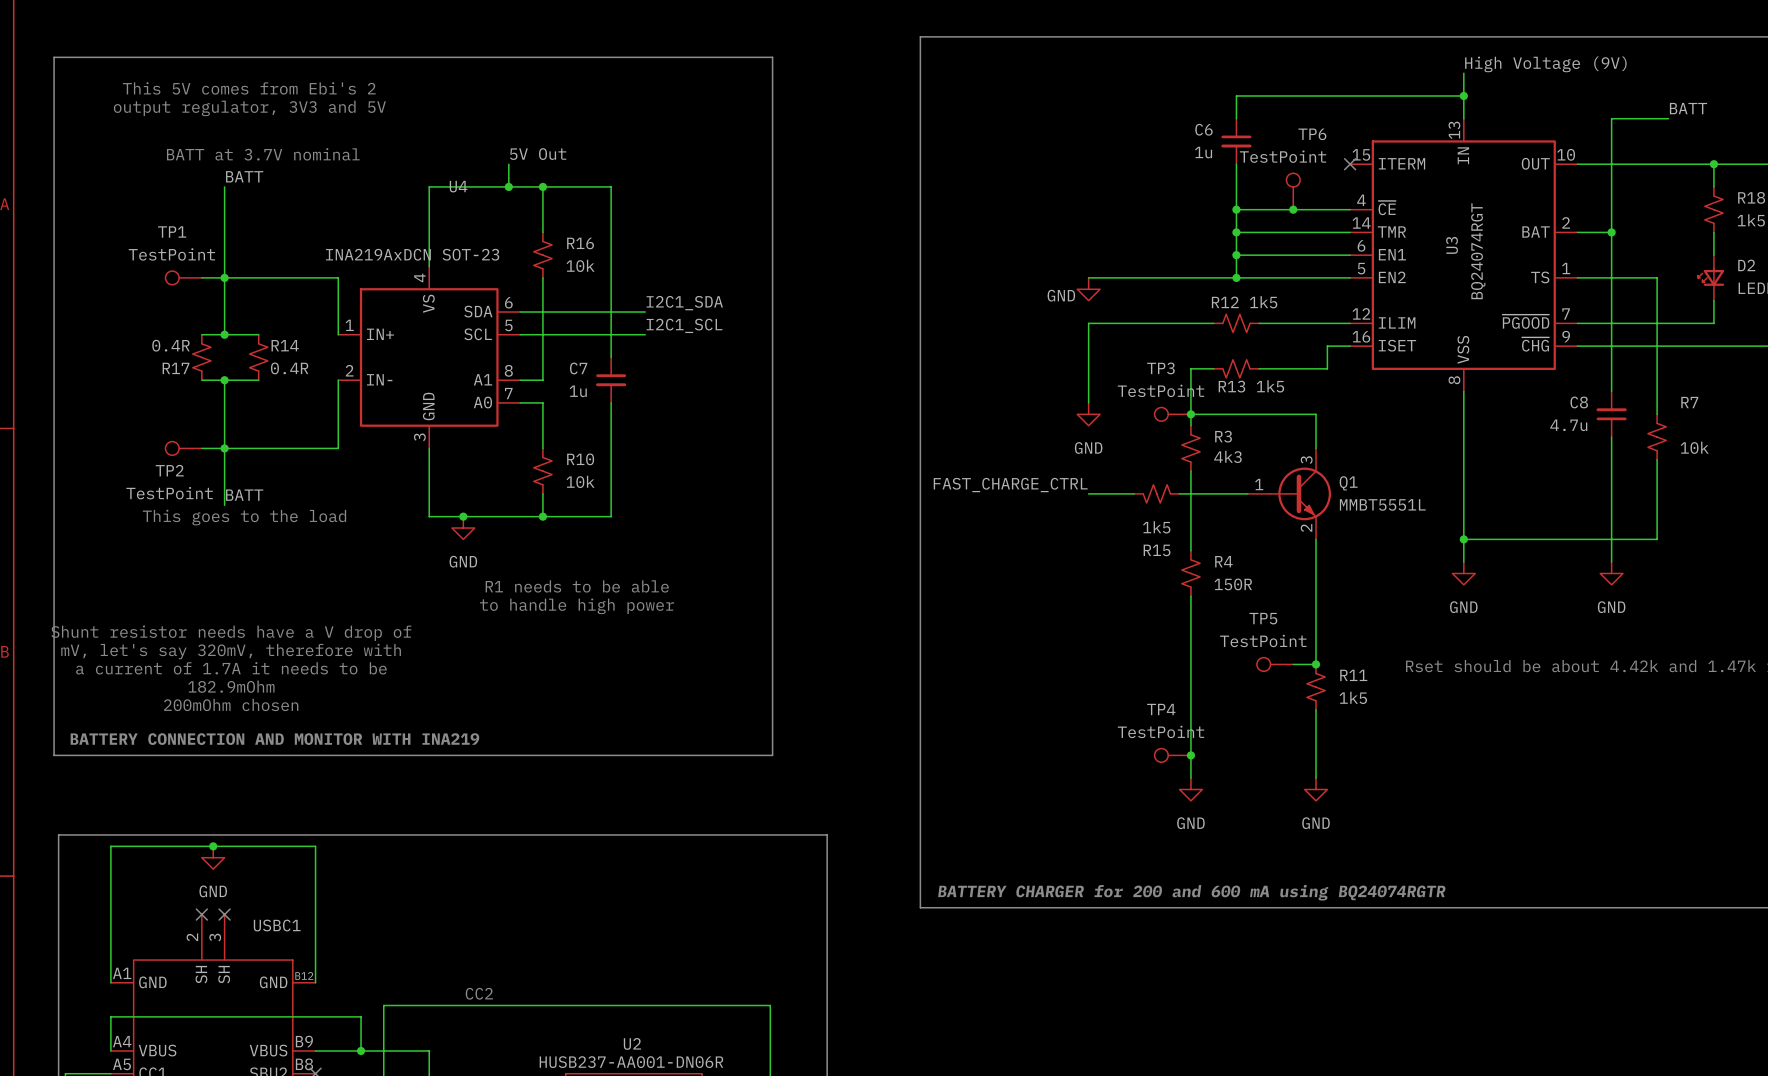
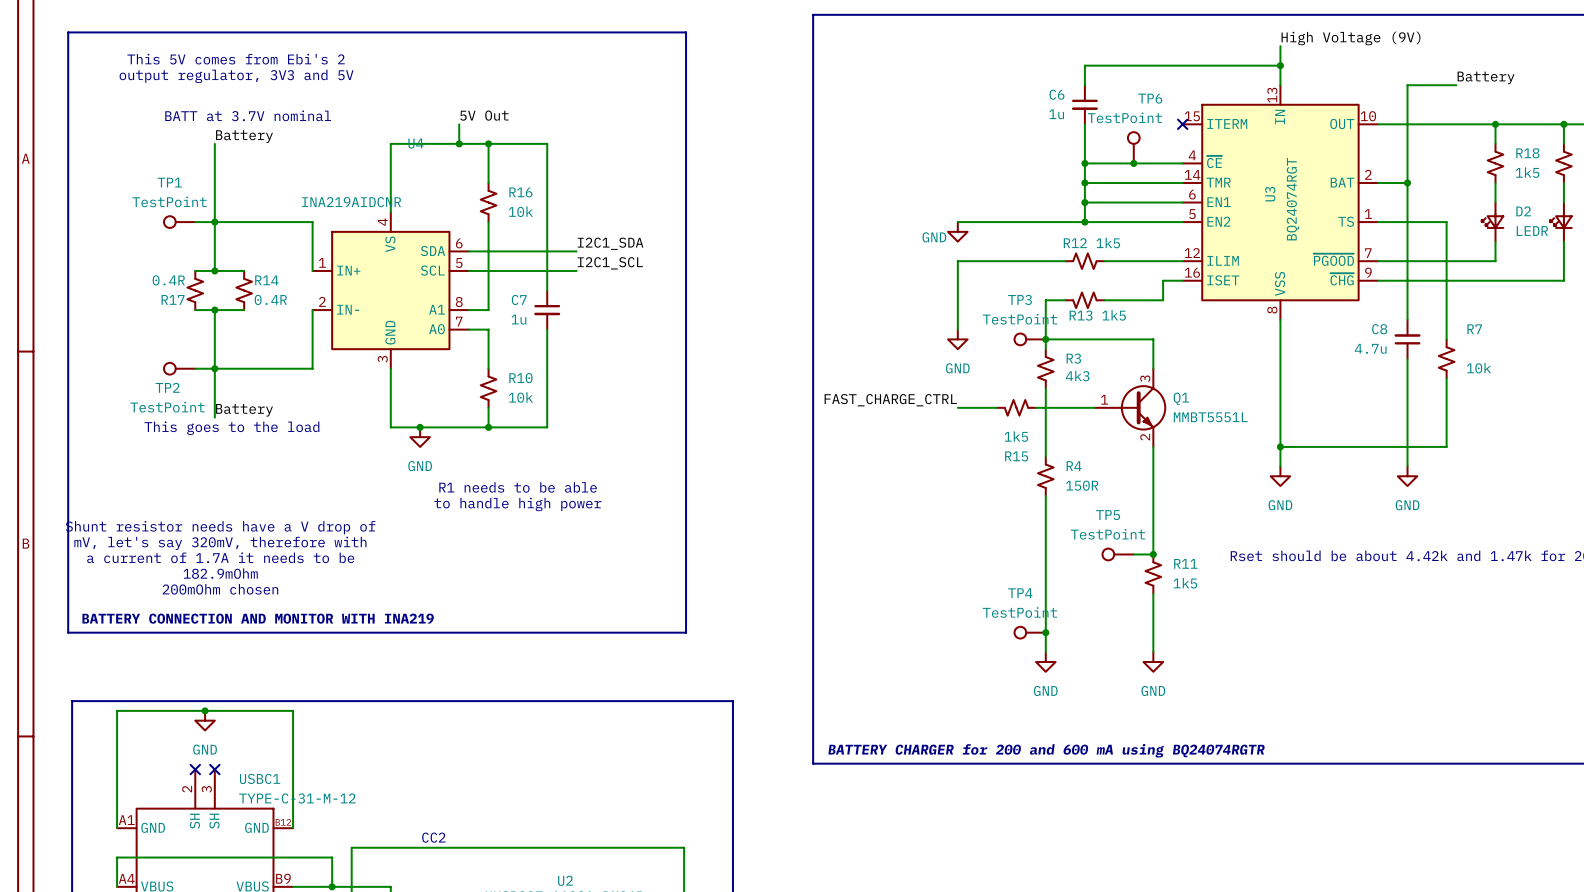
label: BATT (1688, 108) -> Battery (1486, 77)
label: BATT (244, 176) -> Battery (244, 136)
U4 value: INA219AxDCN SOT-23 (412, 254) -> INA219AIDCNR (351, 202)
label: BATT (244, 495) -> Battery (244, 410)
USBC1 value: none -> TYPE-C-31-M-12 (297, 798)

